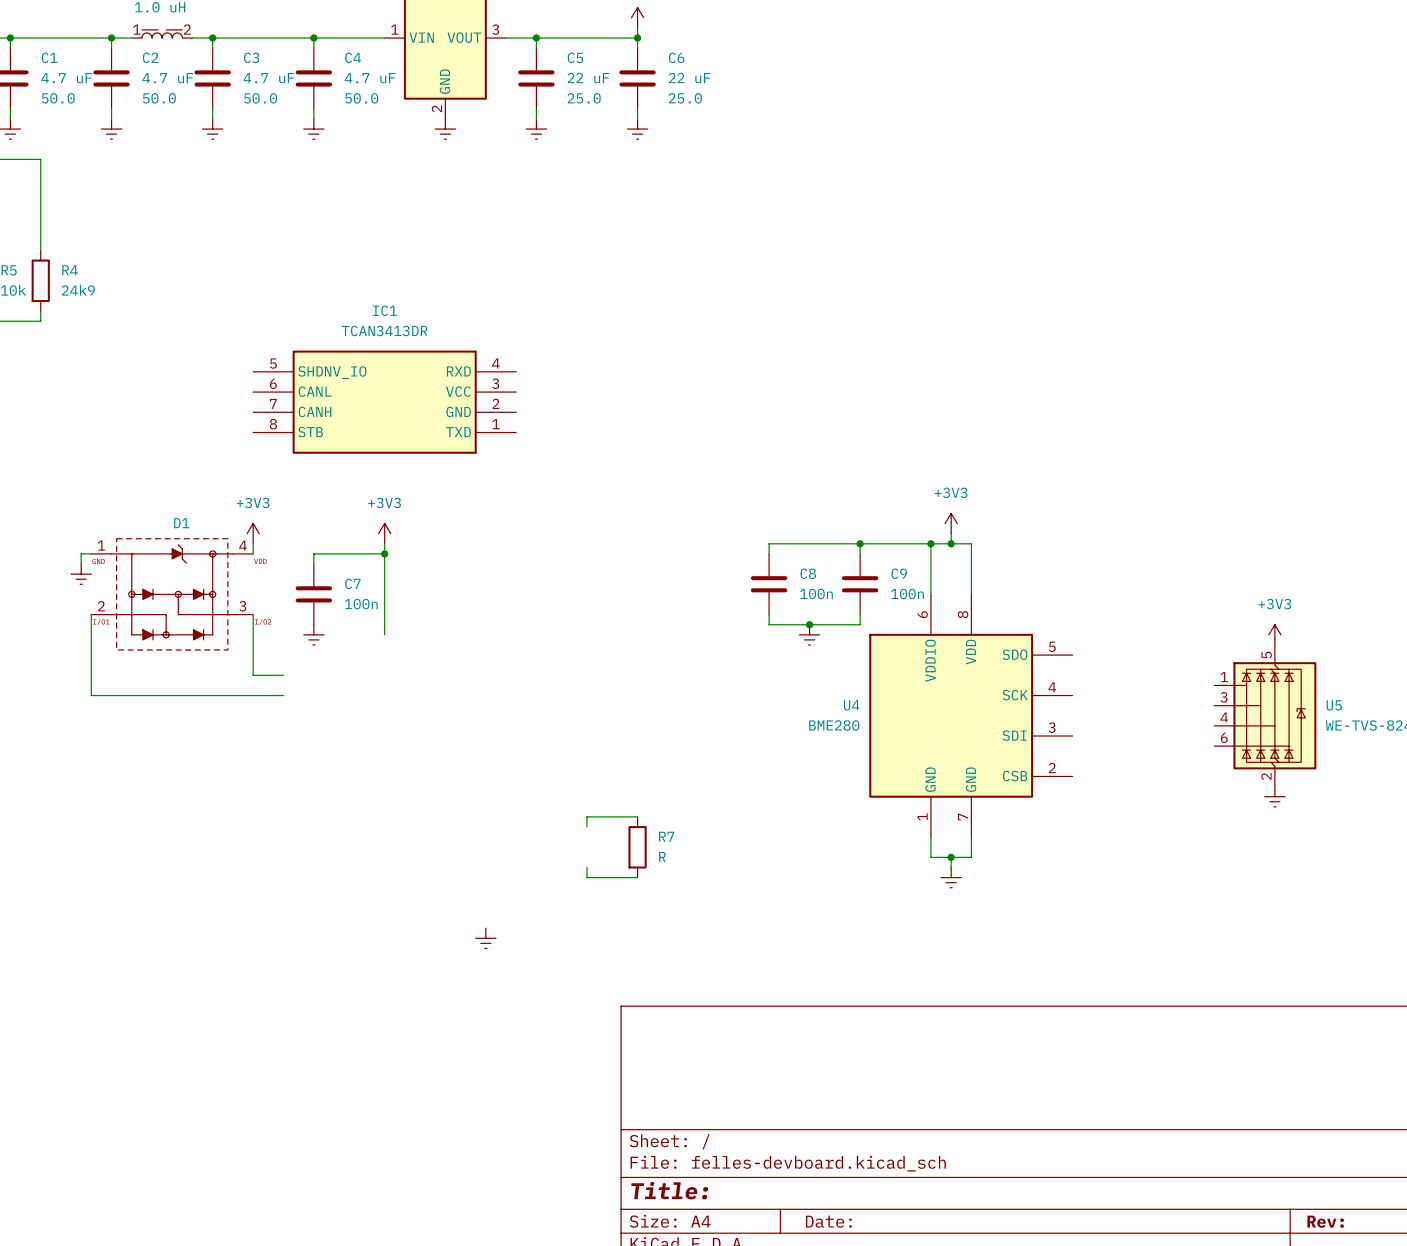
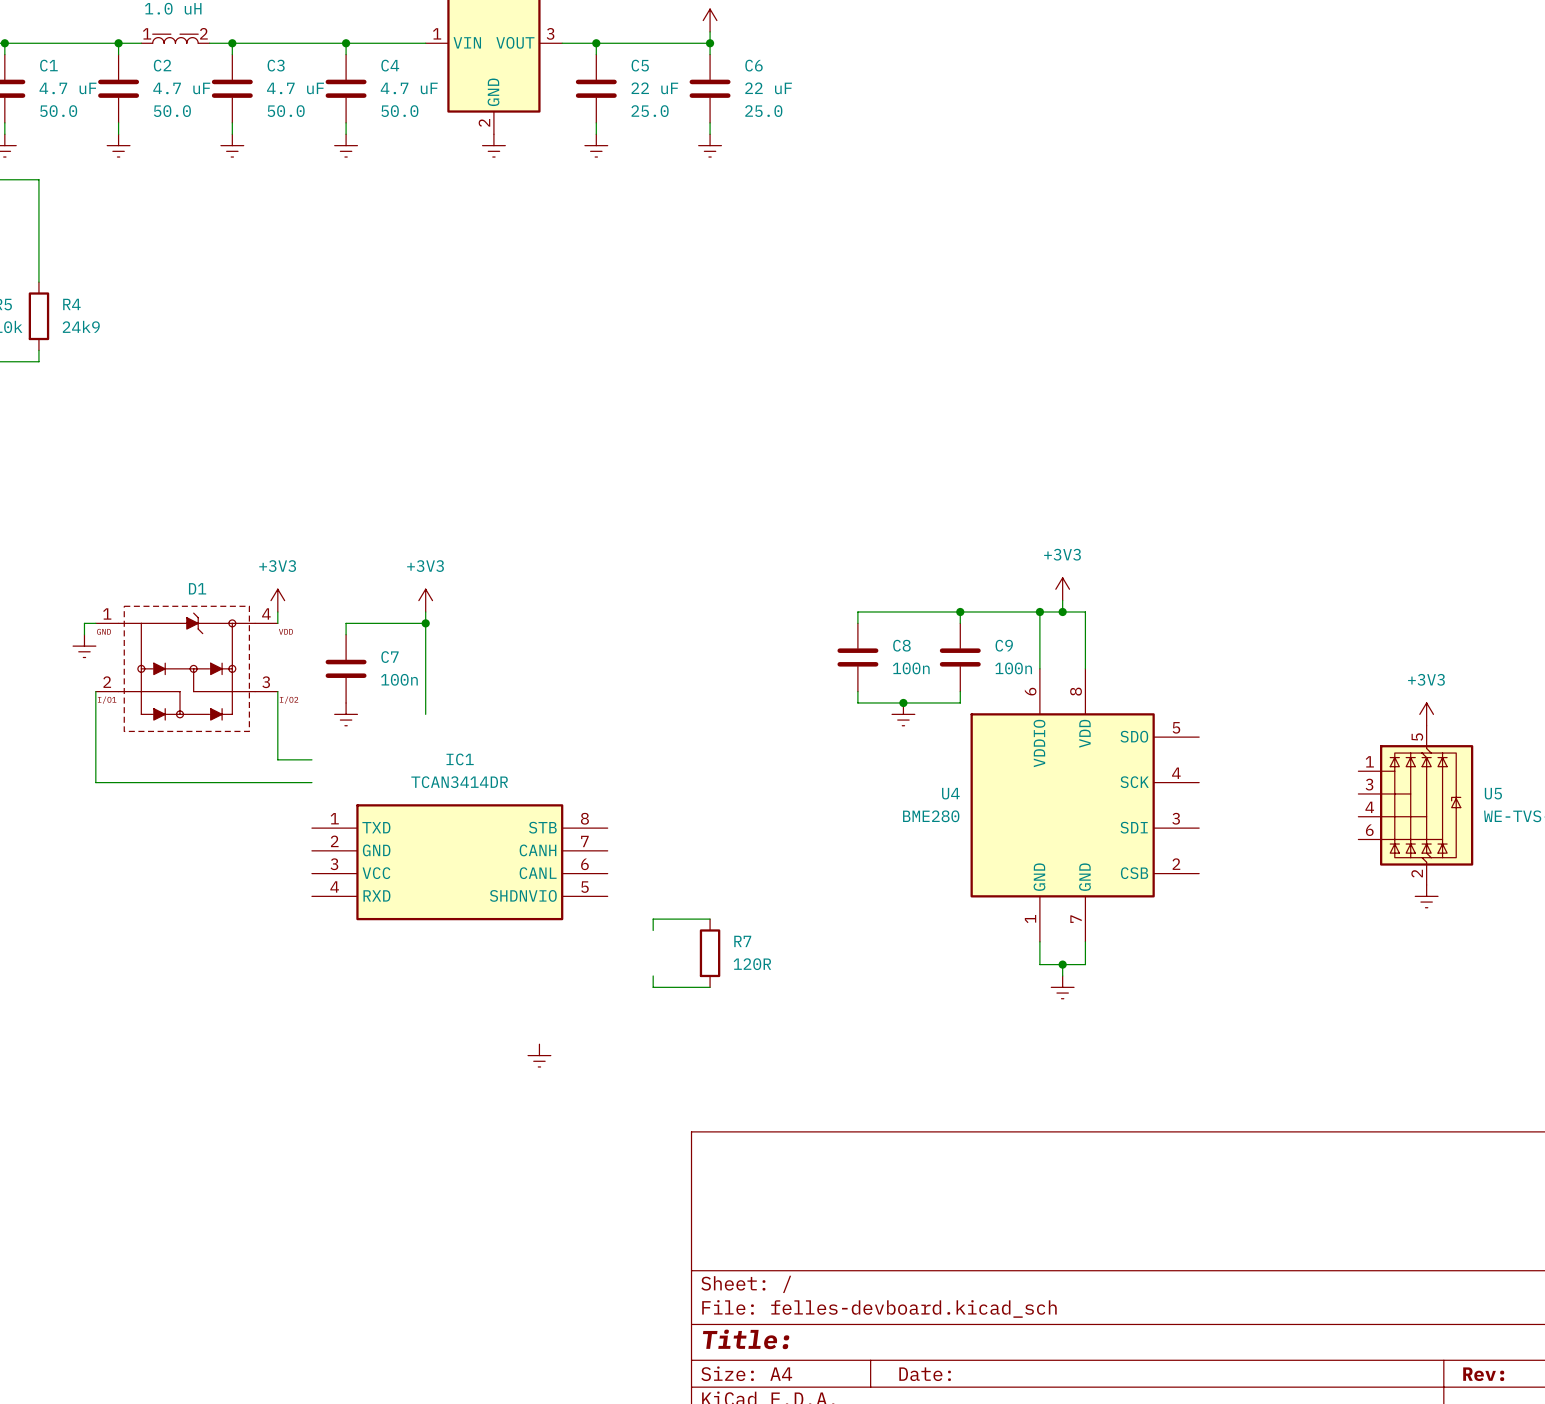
IC1 value: TCAN3413DR (384, 330) -> TCAN3414DR (459, 782)
IC1 symbol: [253, 350, 517, 454] -> [311, 804, 608, 921]
R7 value: R (662, 857) -> 120R (752, 964)

